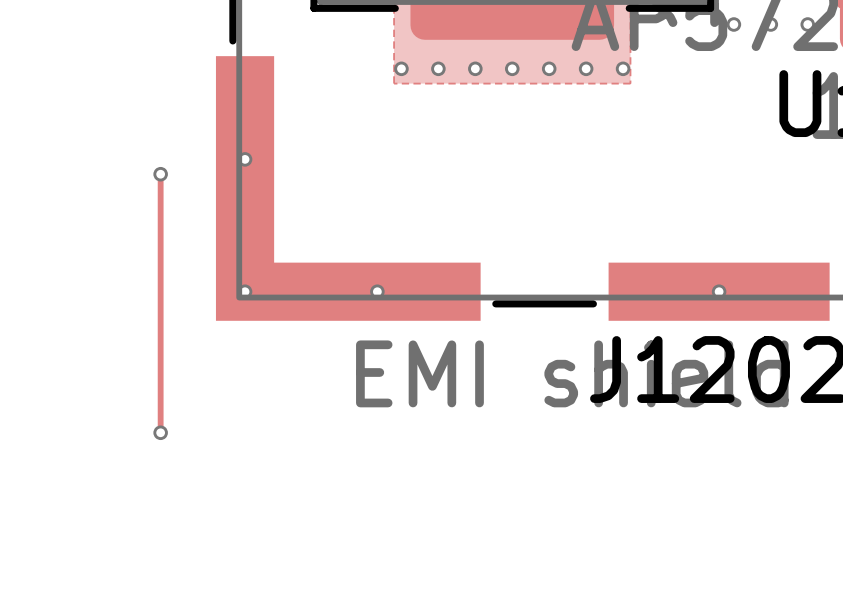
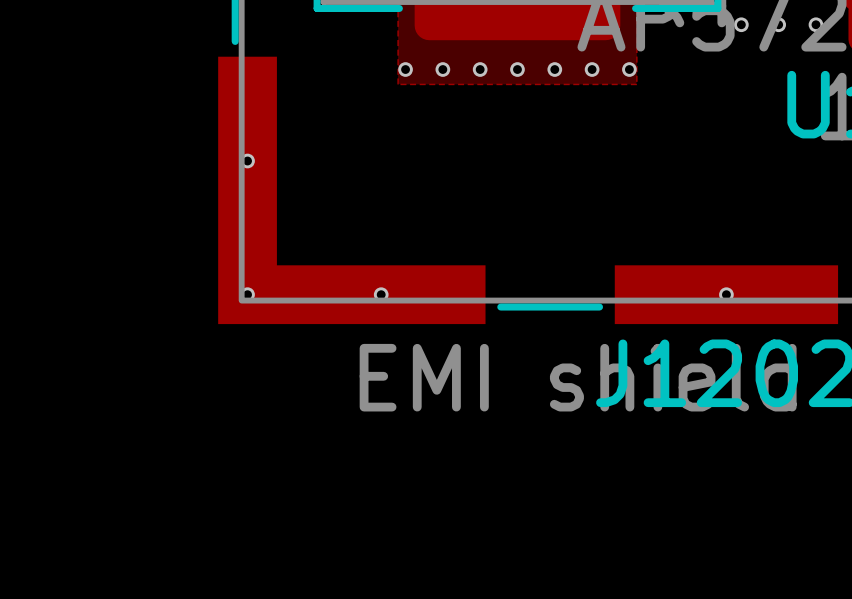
track: (160, 174) (160, 432) -> none
via: (160, 174) -> none
via: (160, 432) -> none

